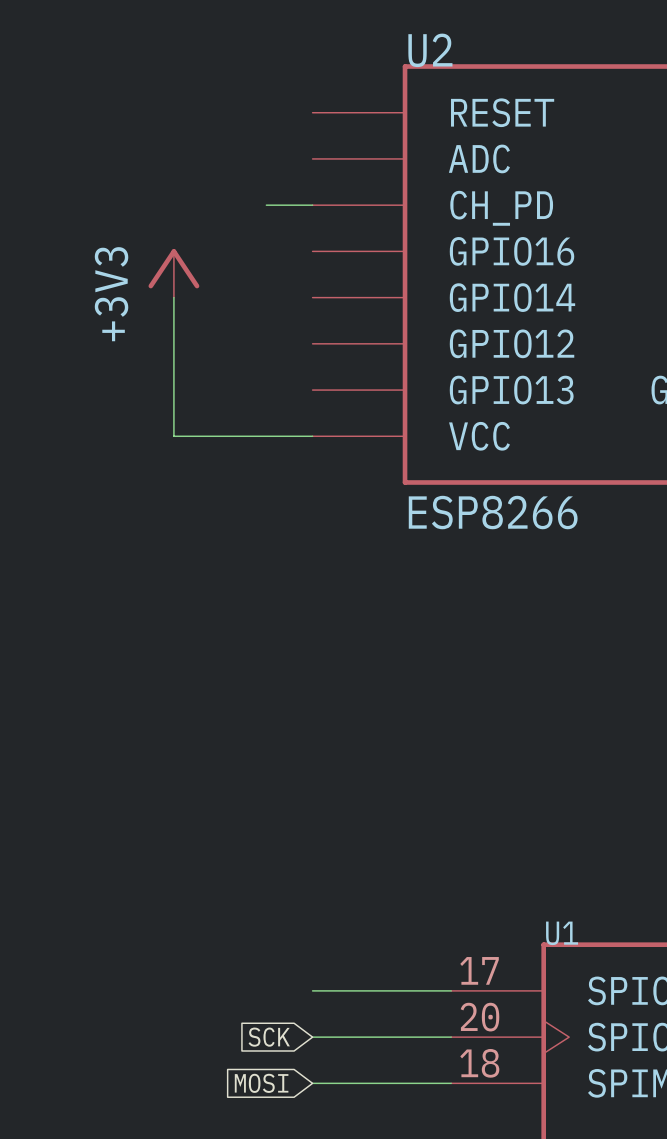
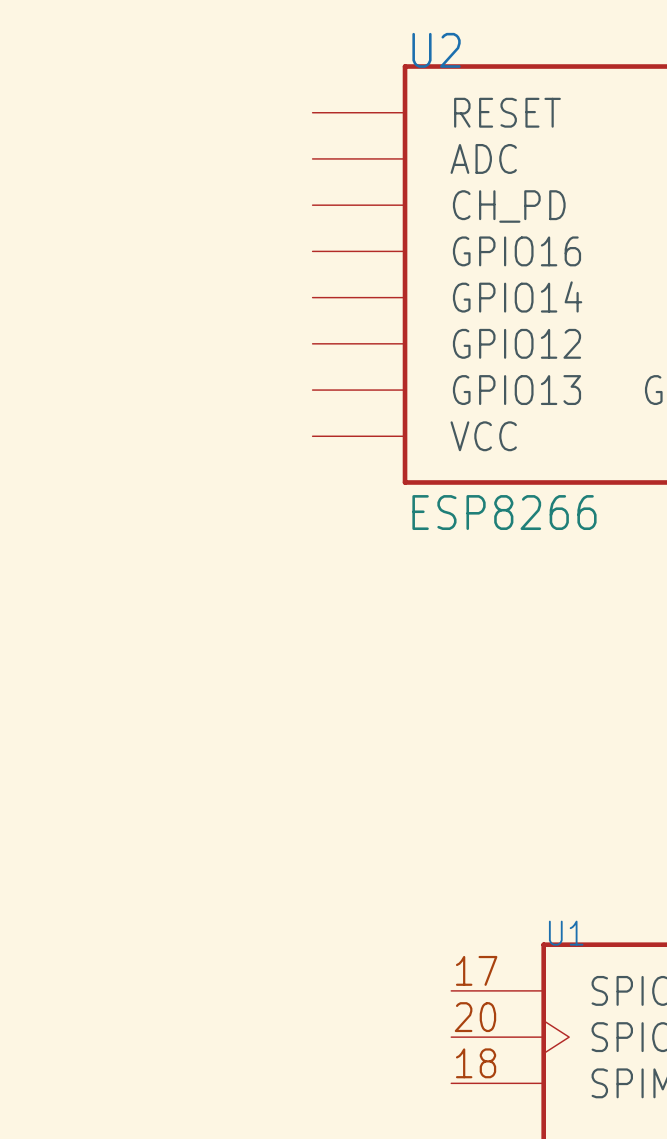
wire: (266, 205) (312, 205) -> none
power symbol: +3V3 (173, 273) -> none
wire: (173, 297) (173, 436) (312, 436) -> none
wire: (312, 990) (451, 990) -> none
global label: SCK (269, 1037) -> none
wire: (312, 1037) (451, 1037) -> none
global label: MOSI (261, 1083) -> none
wire: (312, 1083) (451, 1083) -> none

